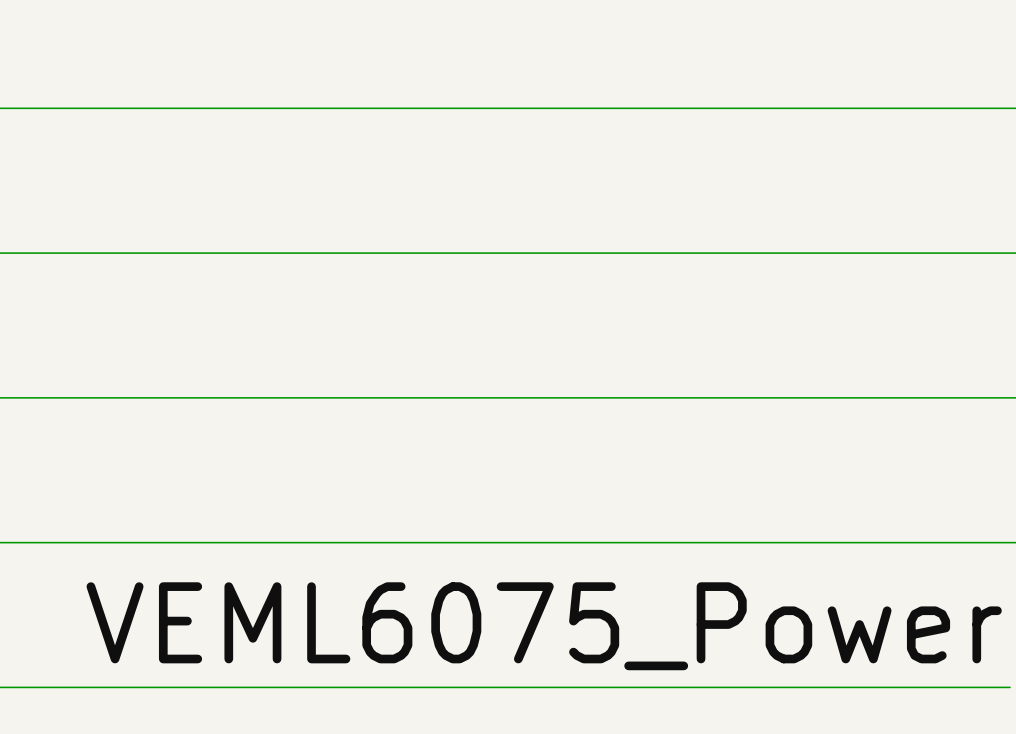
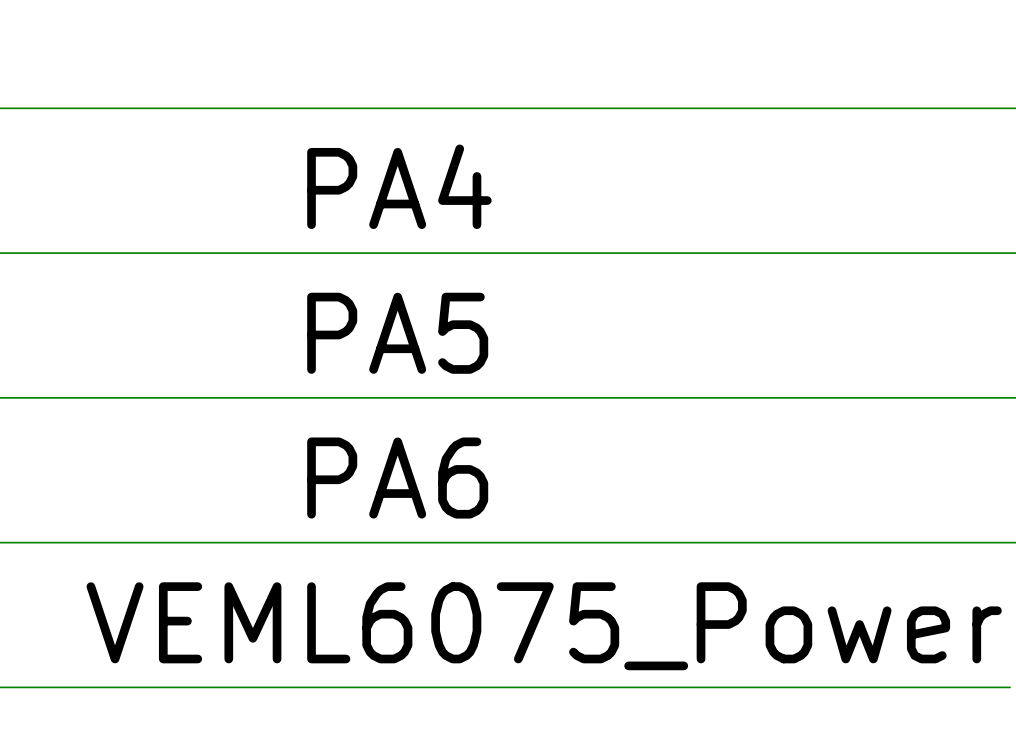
label: none -> PA4 (399, 186)
label: none -> PA5 (397, 333)
label: none -> PA6 (397, 478)

